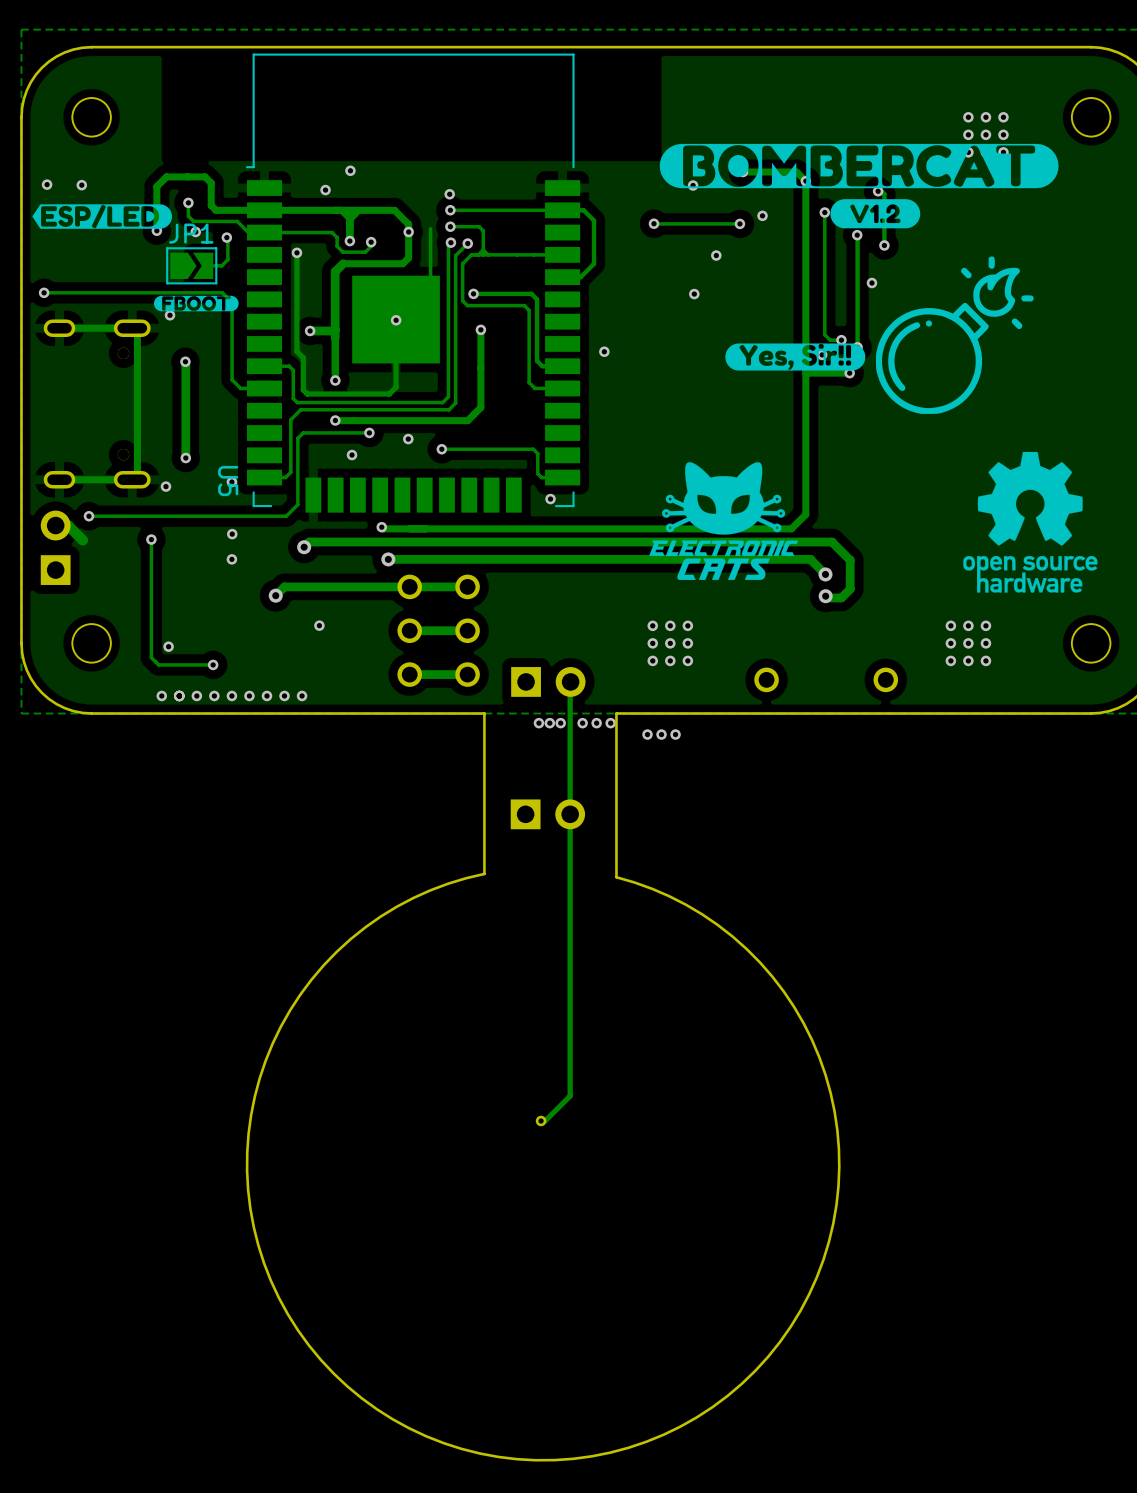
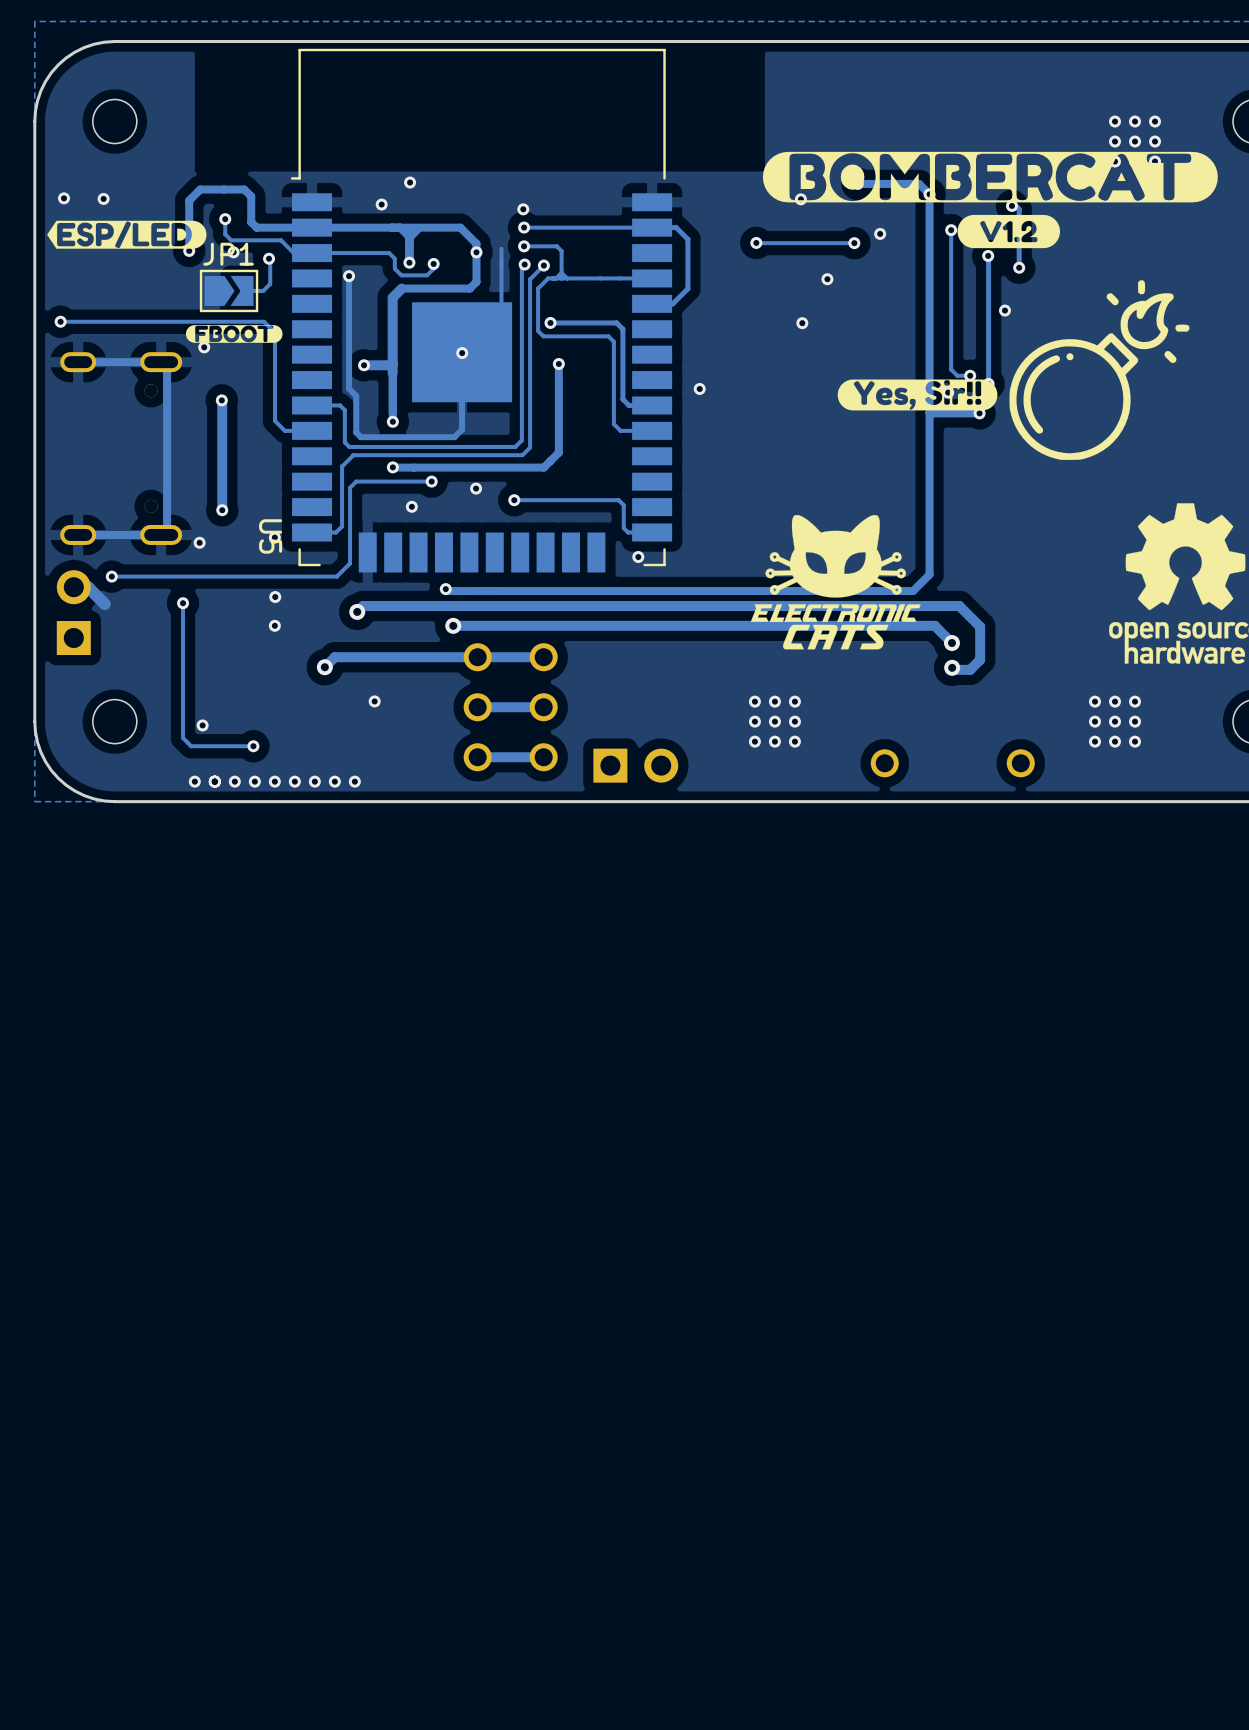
track: (570, 681) (570, 1095) (545, 1121) (541, 1121) -> none
board edge: (616, 713) (616, 877) (669, 896) (717, 924) (759, 962) (794, 1006) (819, 1057) (830, 1093) (838, 1148) (836, 1204) (823, 1259) (800, 1310) (779, 1342) (741, 1383) (696, 1417) (646, 1441) (591, 1456) (535, 1460) (479, 1453) (426, 1436) (376, 1409) (333, 1373) (297, 1330) (278, 1297) (258, 1245) (248, 1190) (248, 1133) (259, 1078) (272, 1043) (300, 994) (336, 951) (380, 916) (430, 890) (484, 873) (484, 713) -> (713, 801) (562, 801)
via: (538, 723) -> none
via: (549, 723) -> none
via: (560, 723) -> none
via: (582, 723) -> none
via: (596, 723) -> none
via: (610, 723) -> none
via: (647, 734) -> none
via: (661, 734) -> none
via: (675, 734) -> none
part: (547, 814) -> none
part: (541, 1121) -> none

